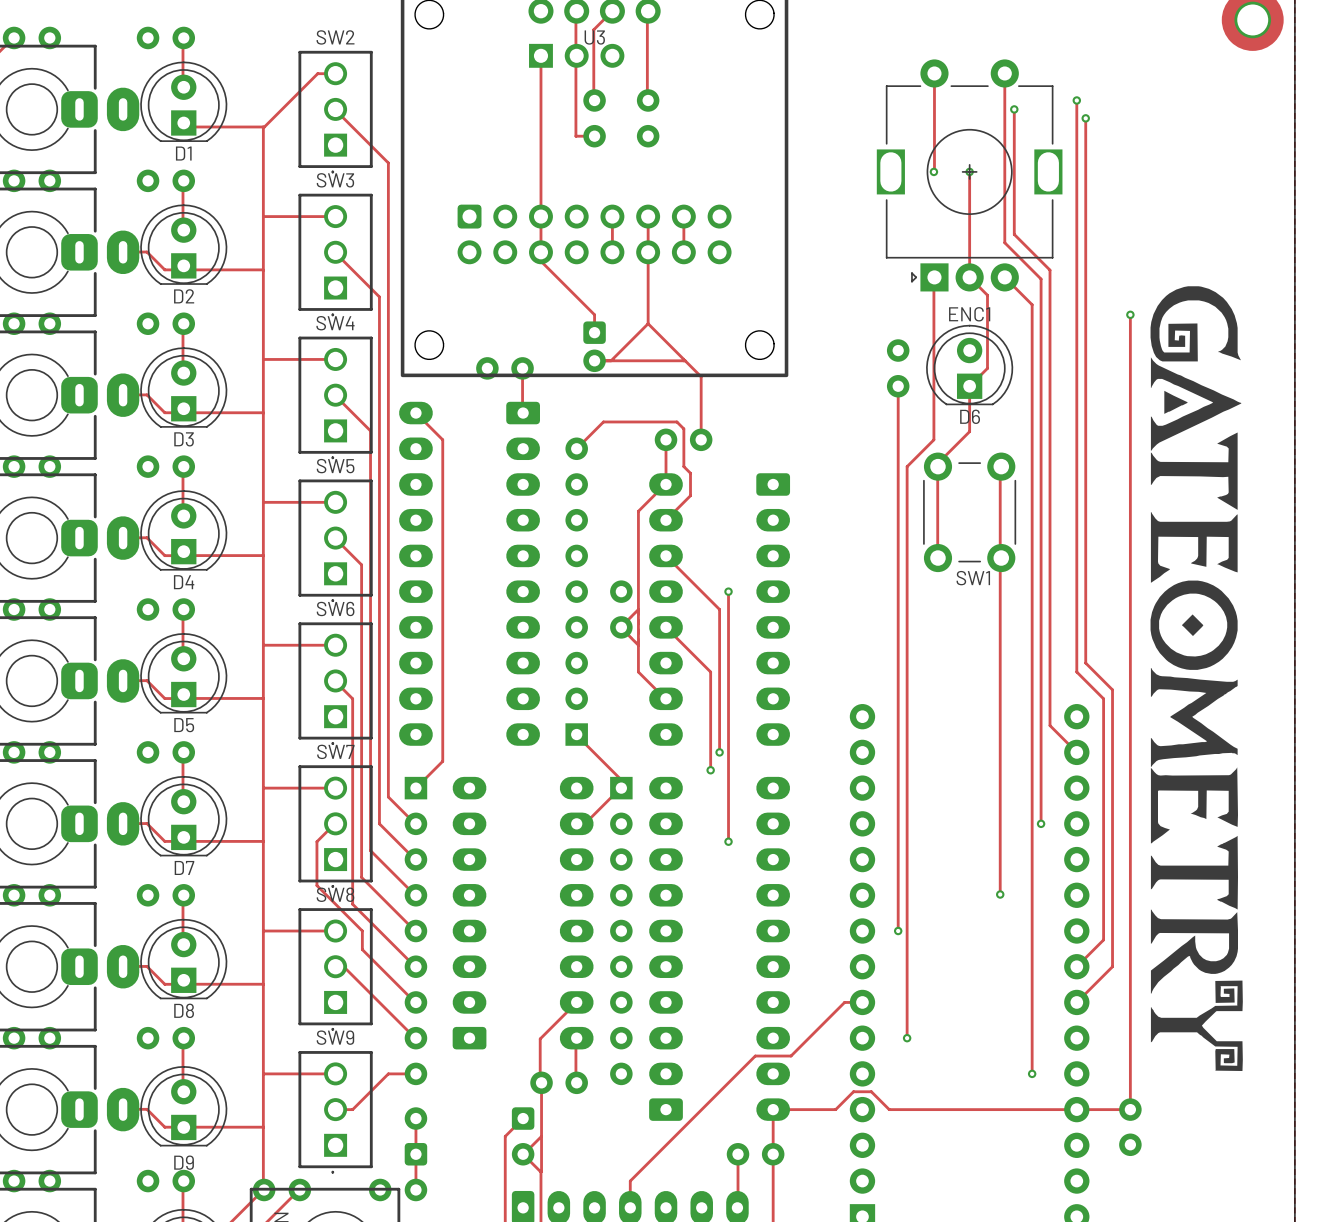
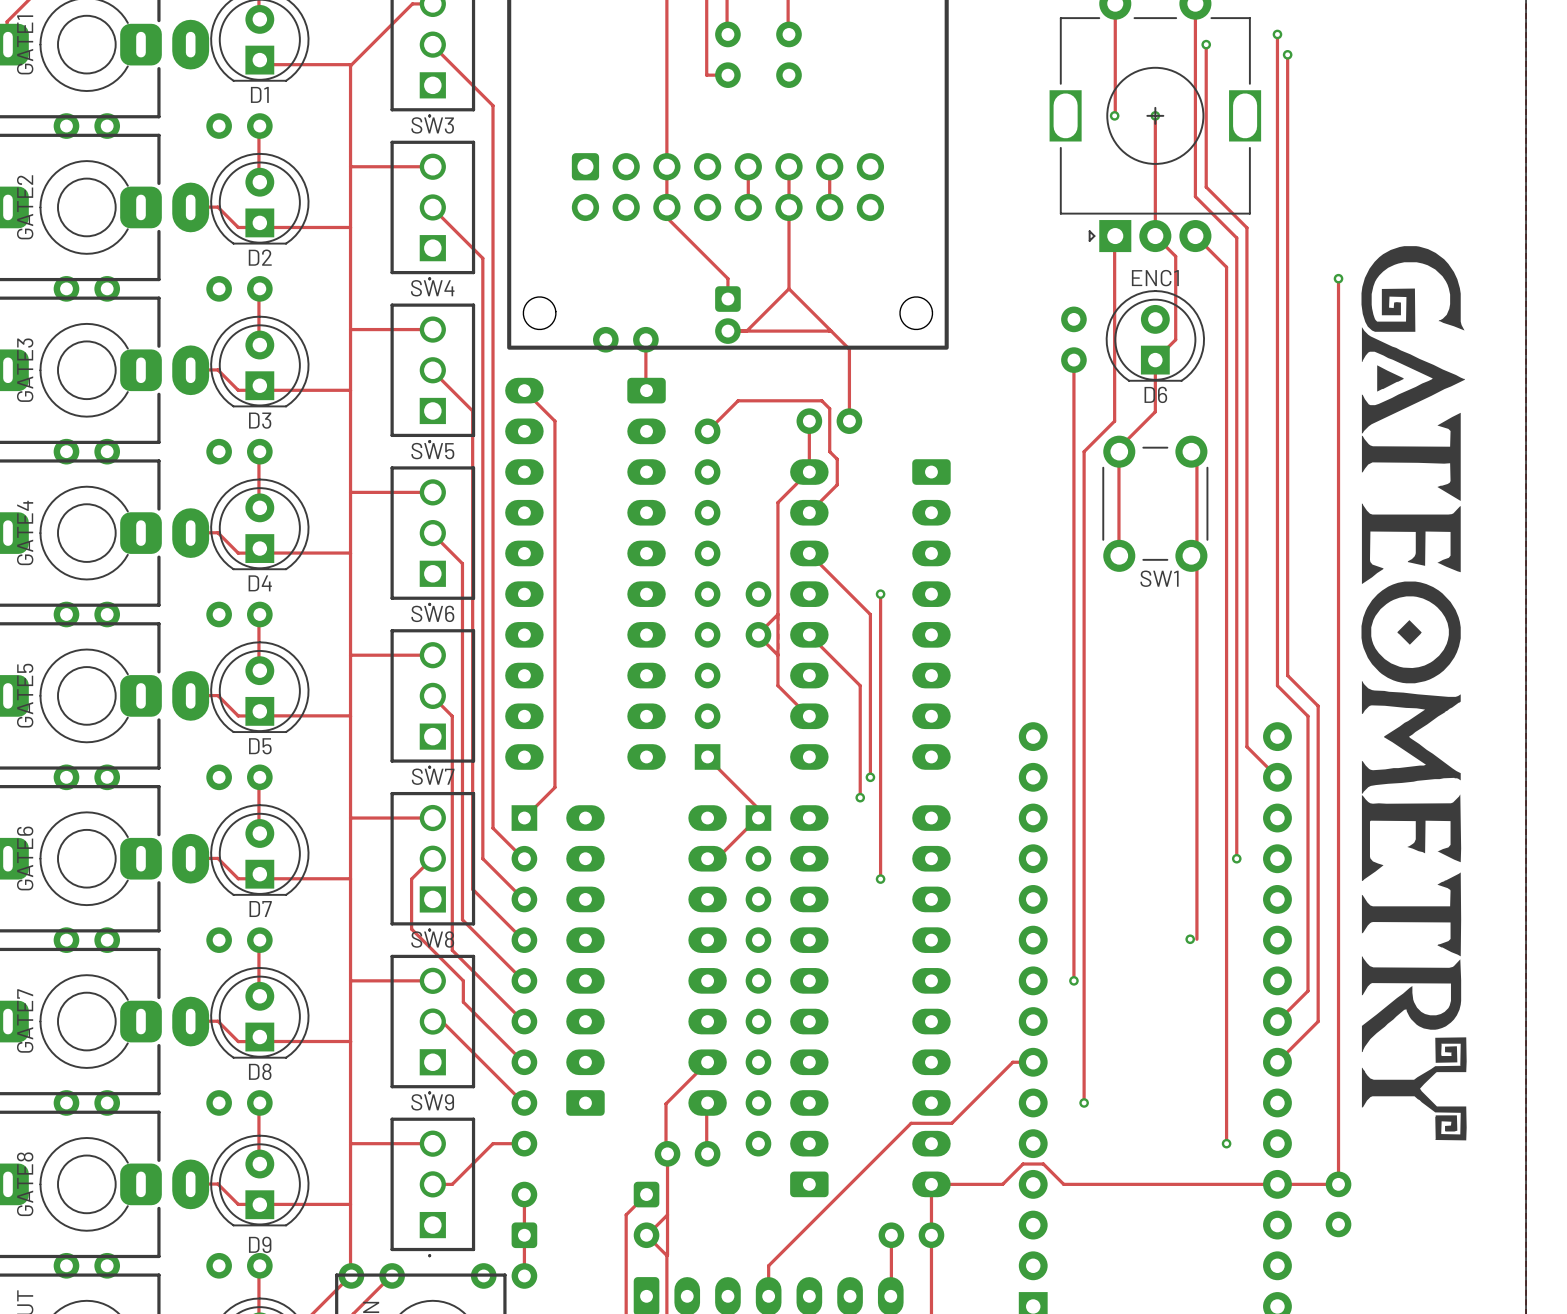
track: (1001, 466) (1000, 894) -> none
track: none -> (1196, 451) (1196, 939)

